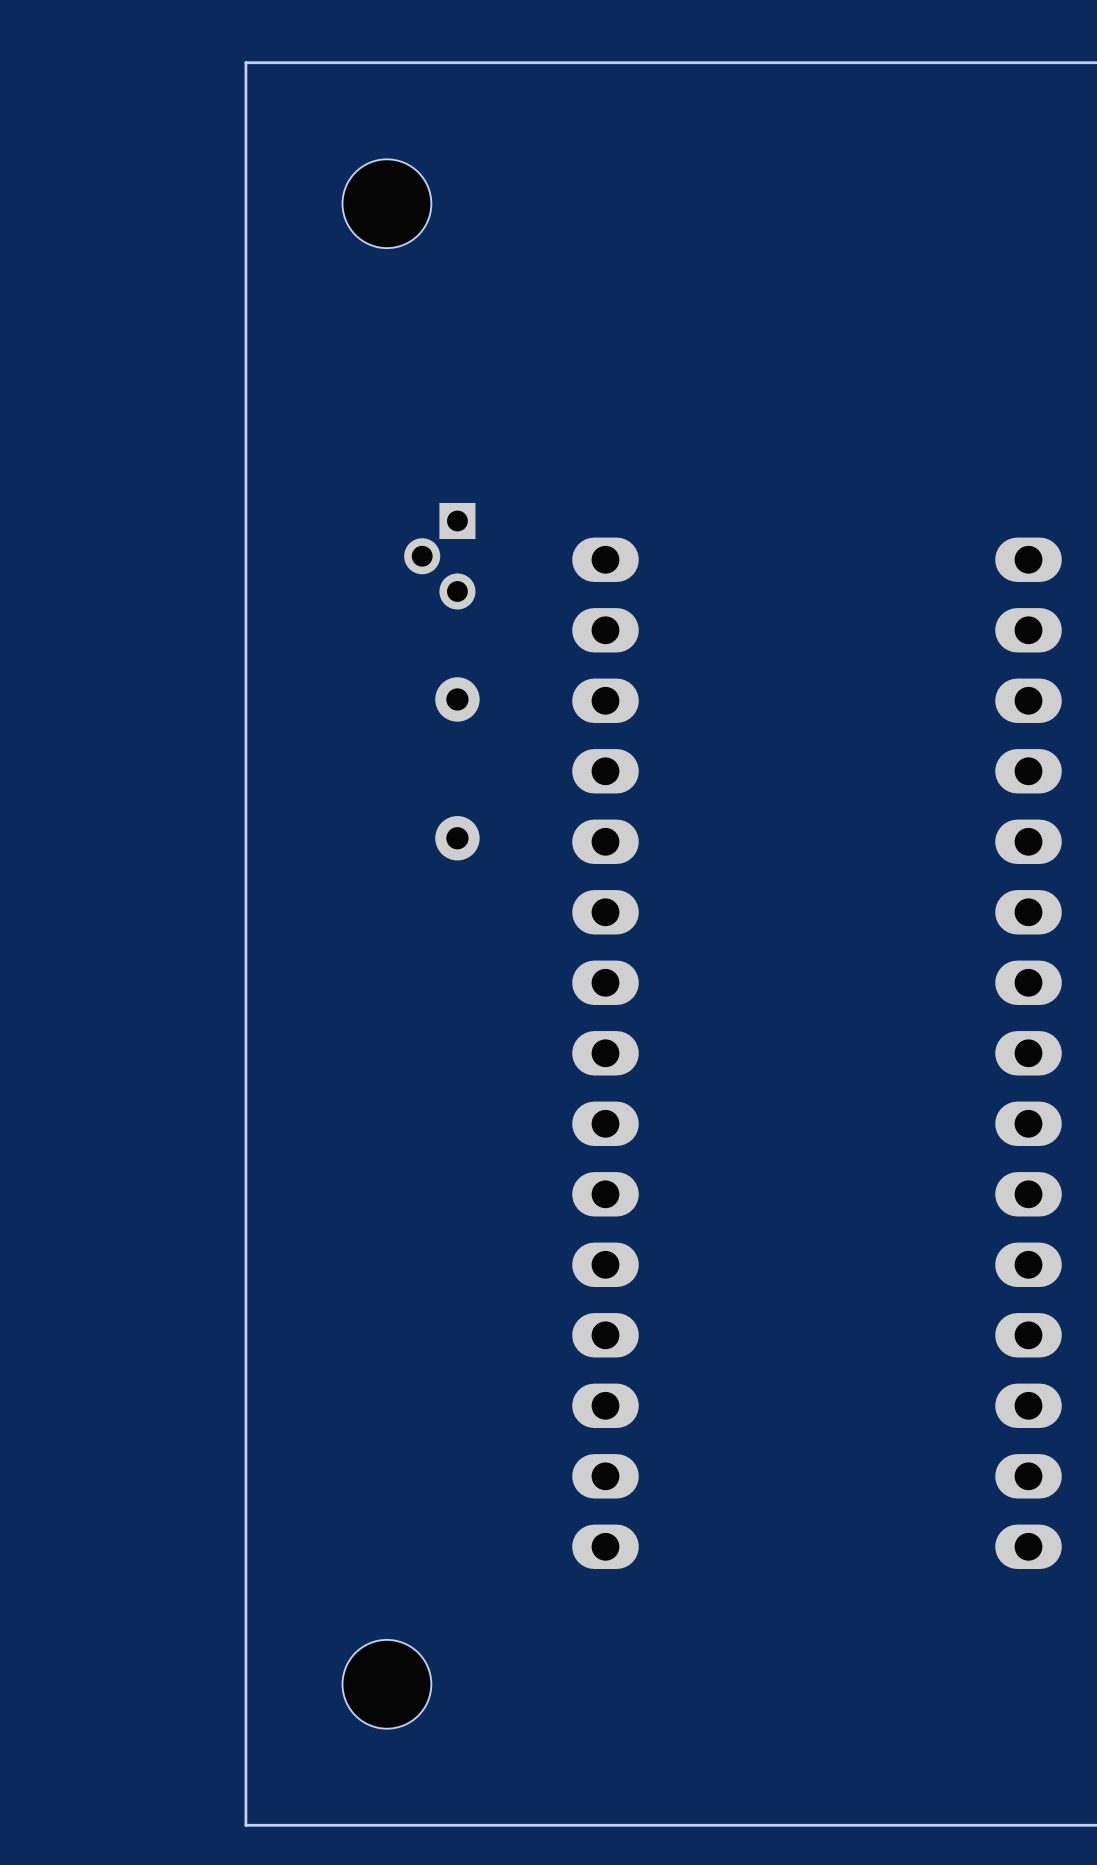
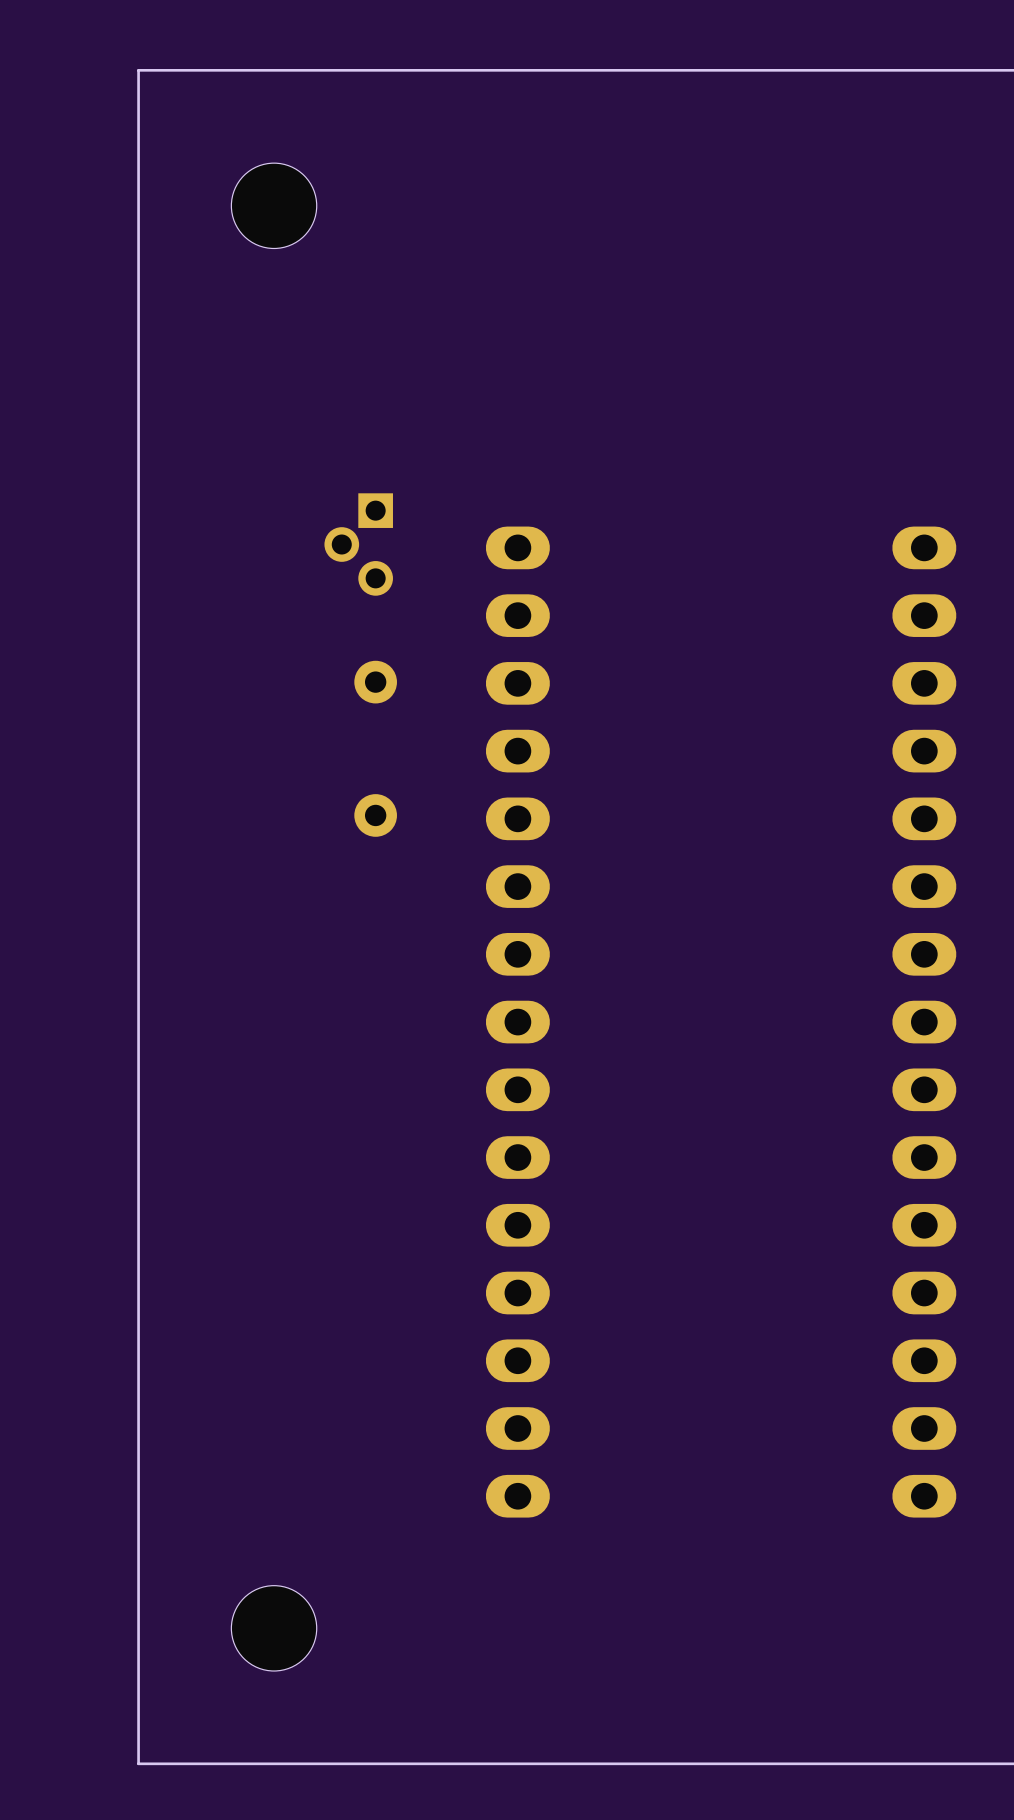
board edge: (245, 62) (245, 1825) -> (172, 70) (138, 70) (138, 1763) (172, 1763)
part position: (386, 203) -> (274, 205)
part position: (386, 1684) -> (274, 1628)

